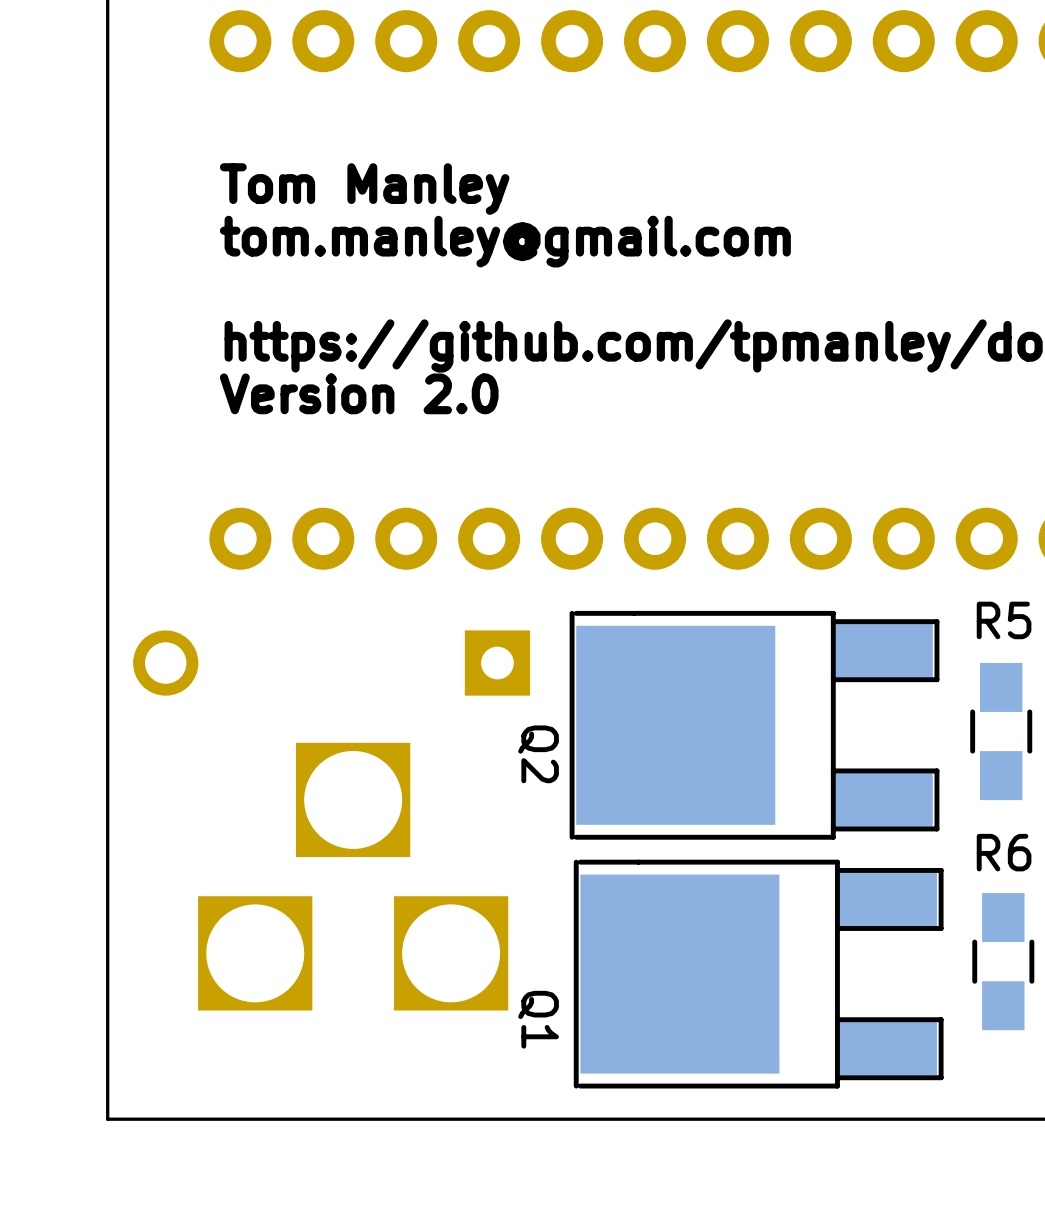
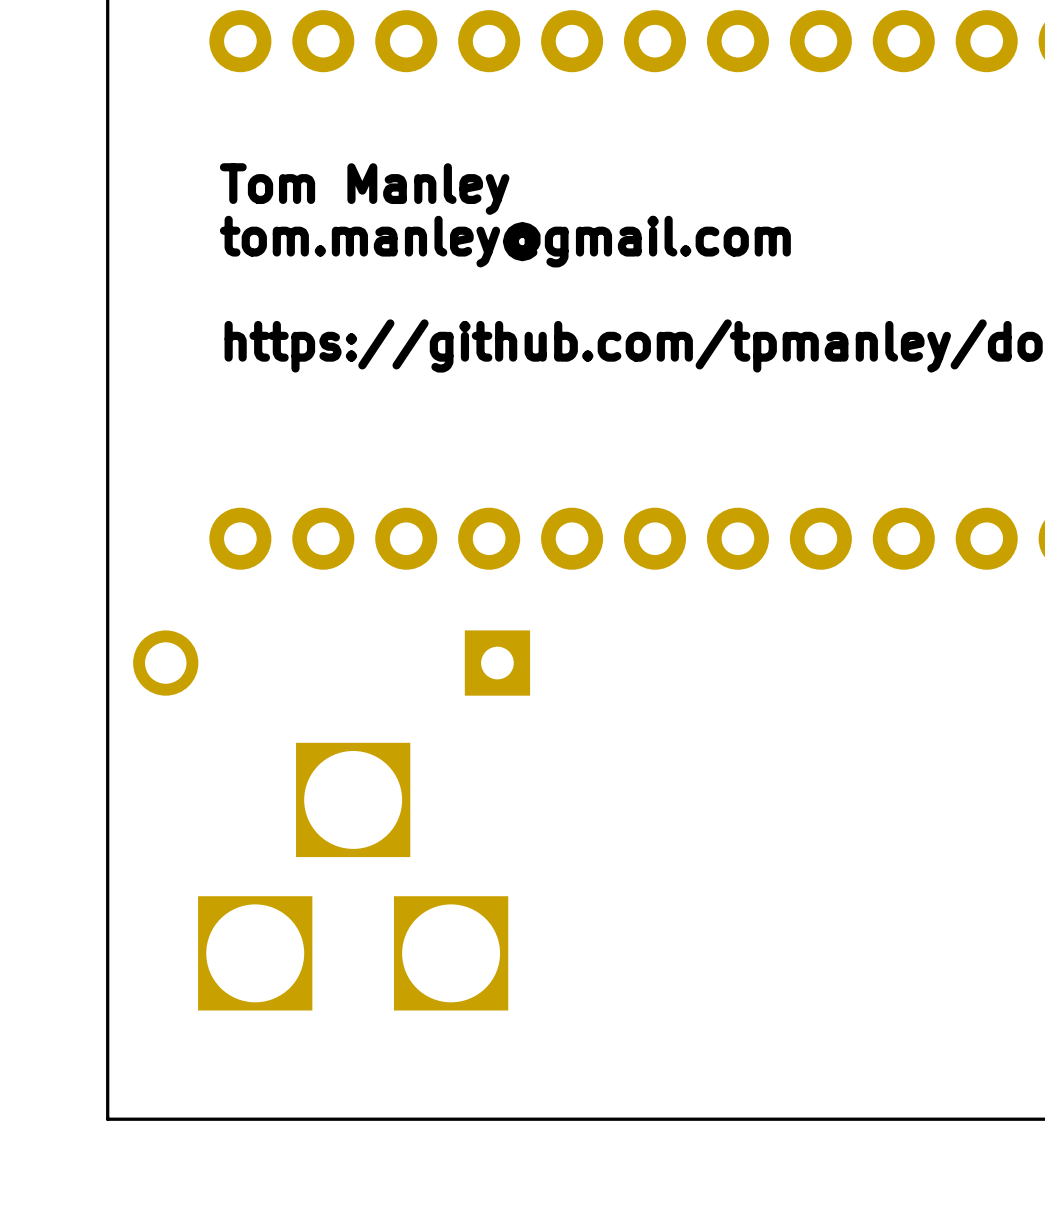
text: Version 2.0 (359, 393) -> none
Q2: (754, 725) -> none
R5: (1001, 731) -> none
R6: (1003, 961) -> none
Q1: (758, 974) -> none

